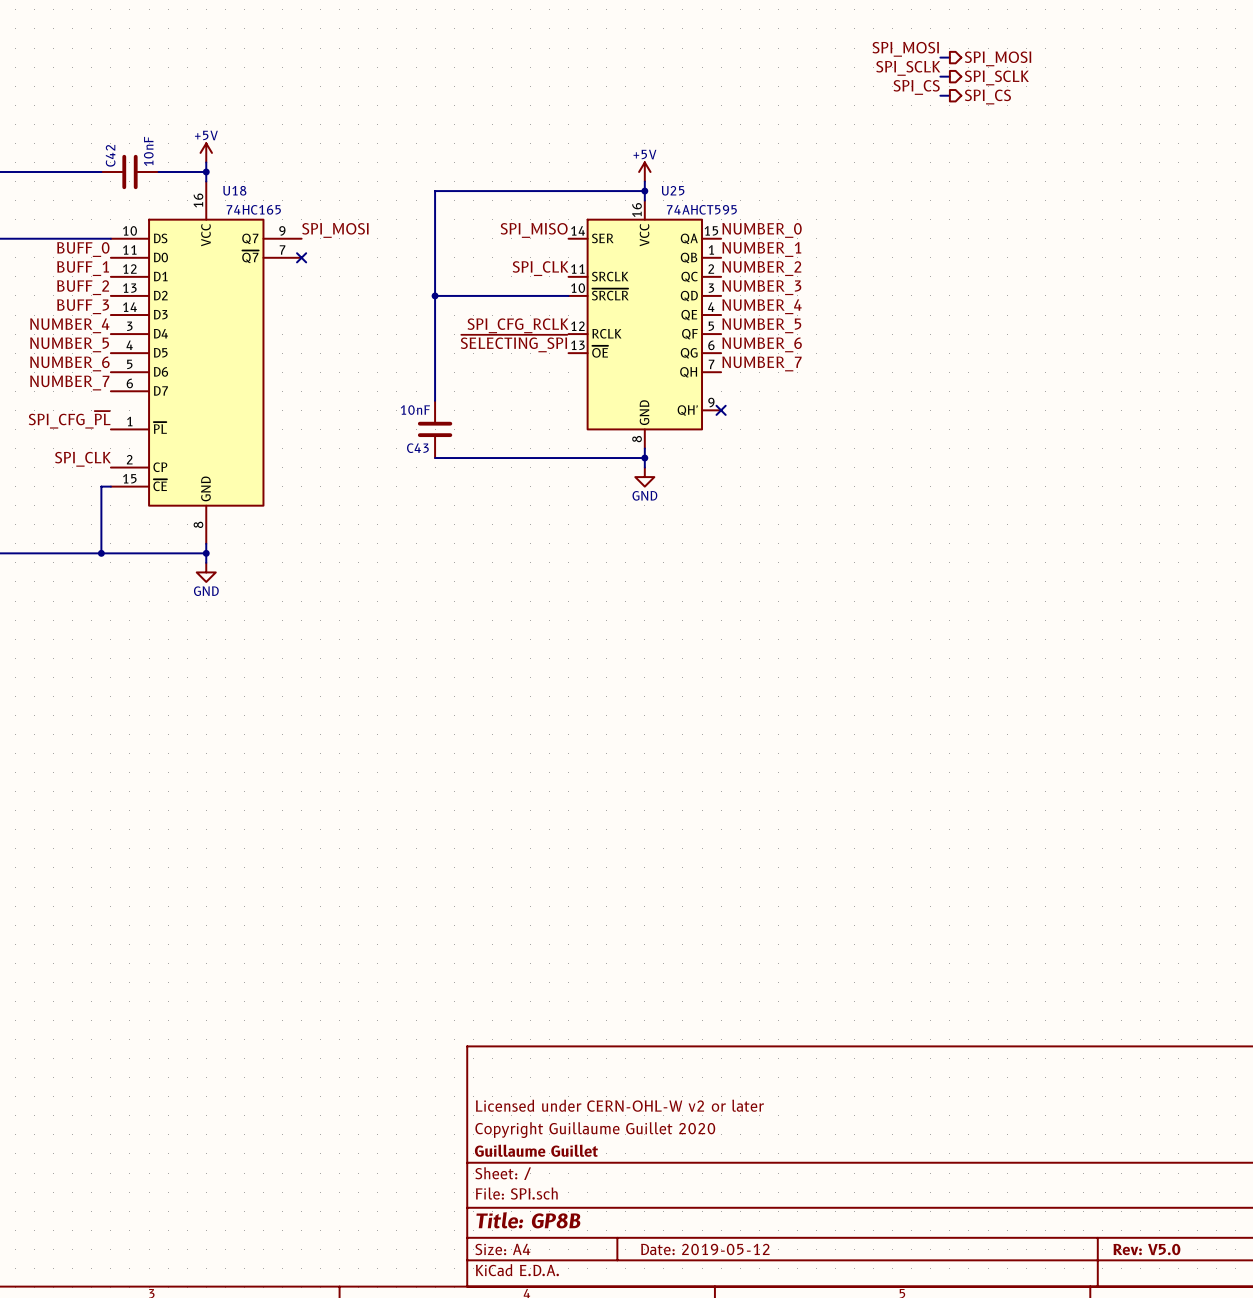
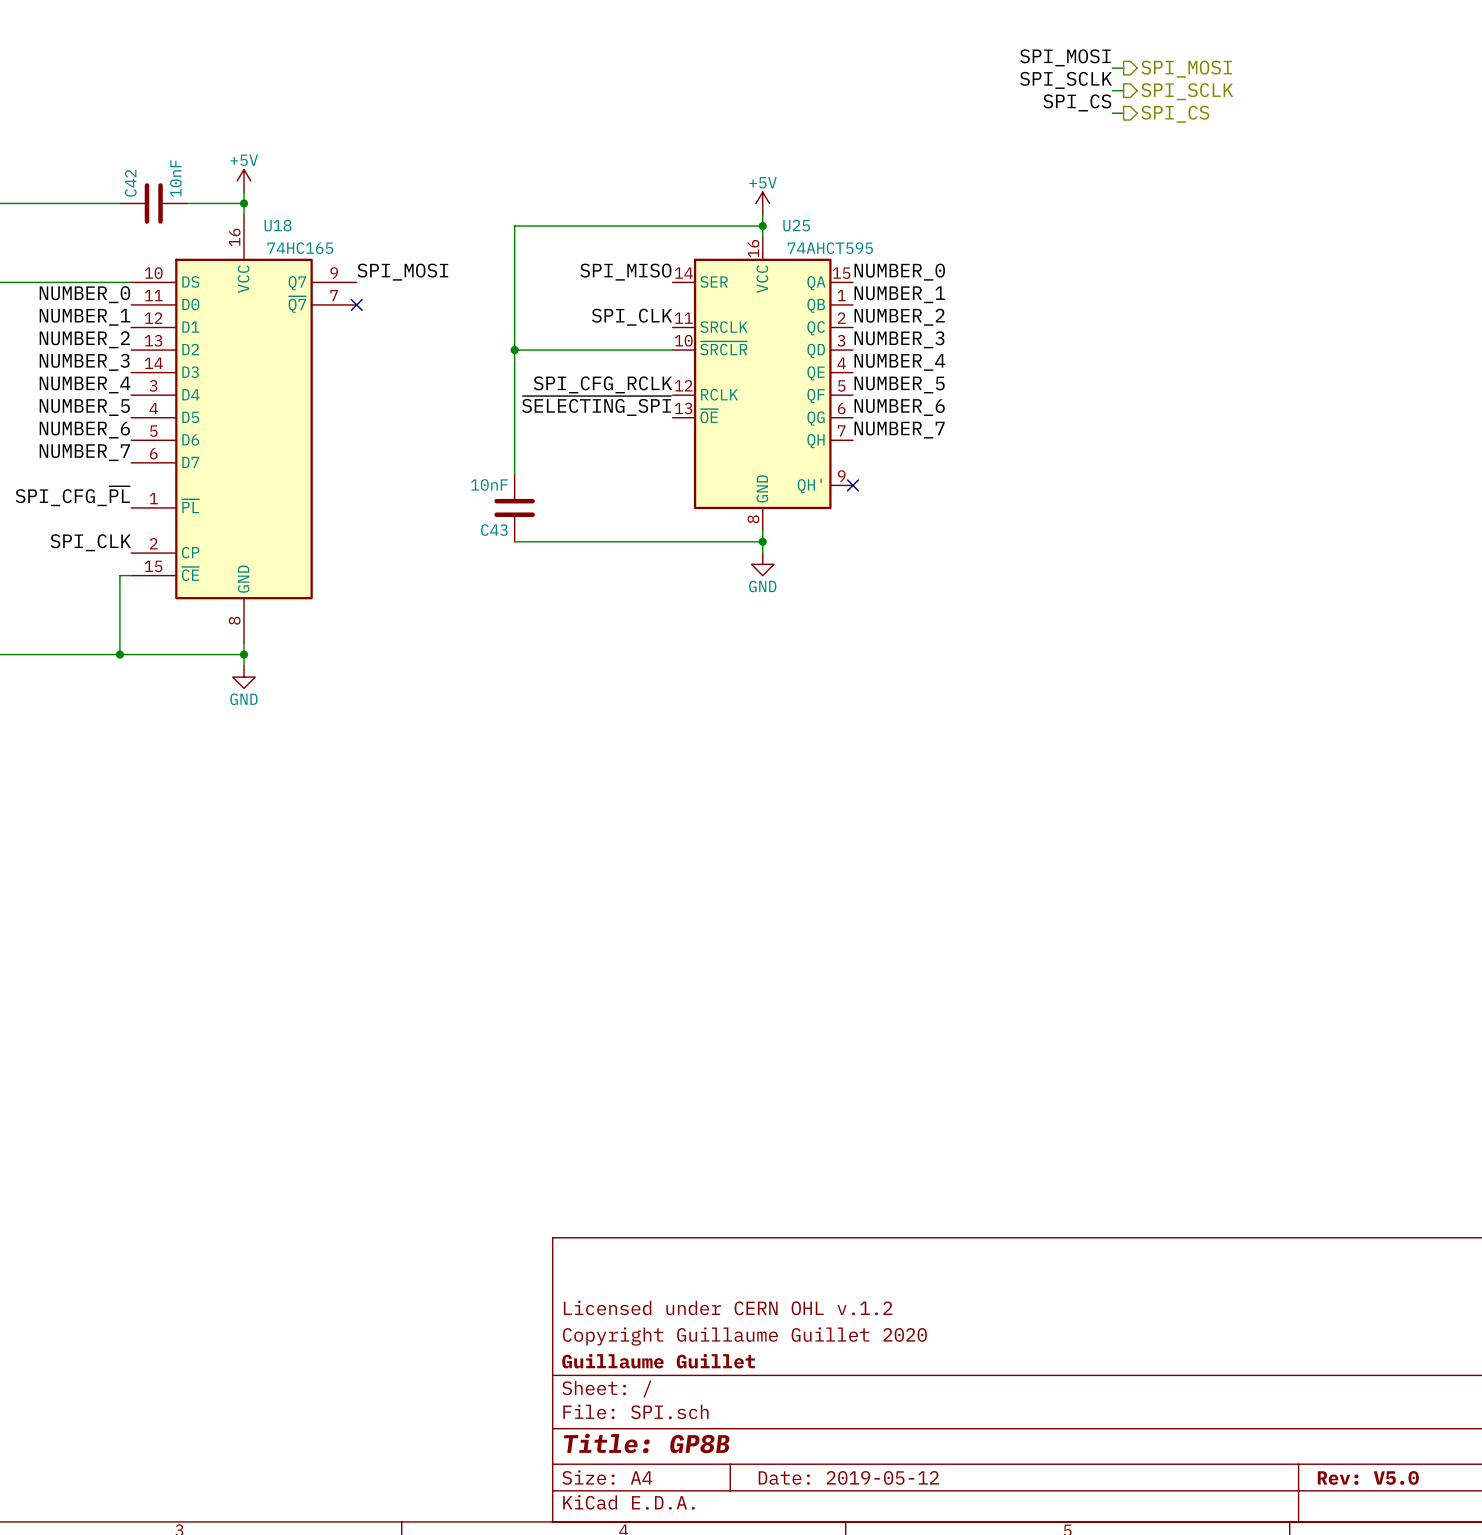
label: BUFF_0 (83, 249) -> NUMBER_0 (84, 294)
label: BUFF_1 (83, 268) -> NUMBER_1 (84, 317)
label: BUFF_2 (83, 287) -> NUMBER_2 (84, 339)
label: BUFF_3 (83, 306) -> NUMBER_3 (84, 362)
title block: Licensed under CERN-OHL-W v2 or later (619, 1105) -> Licensed under CERN OHL v.1.2 (728, 1307)

